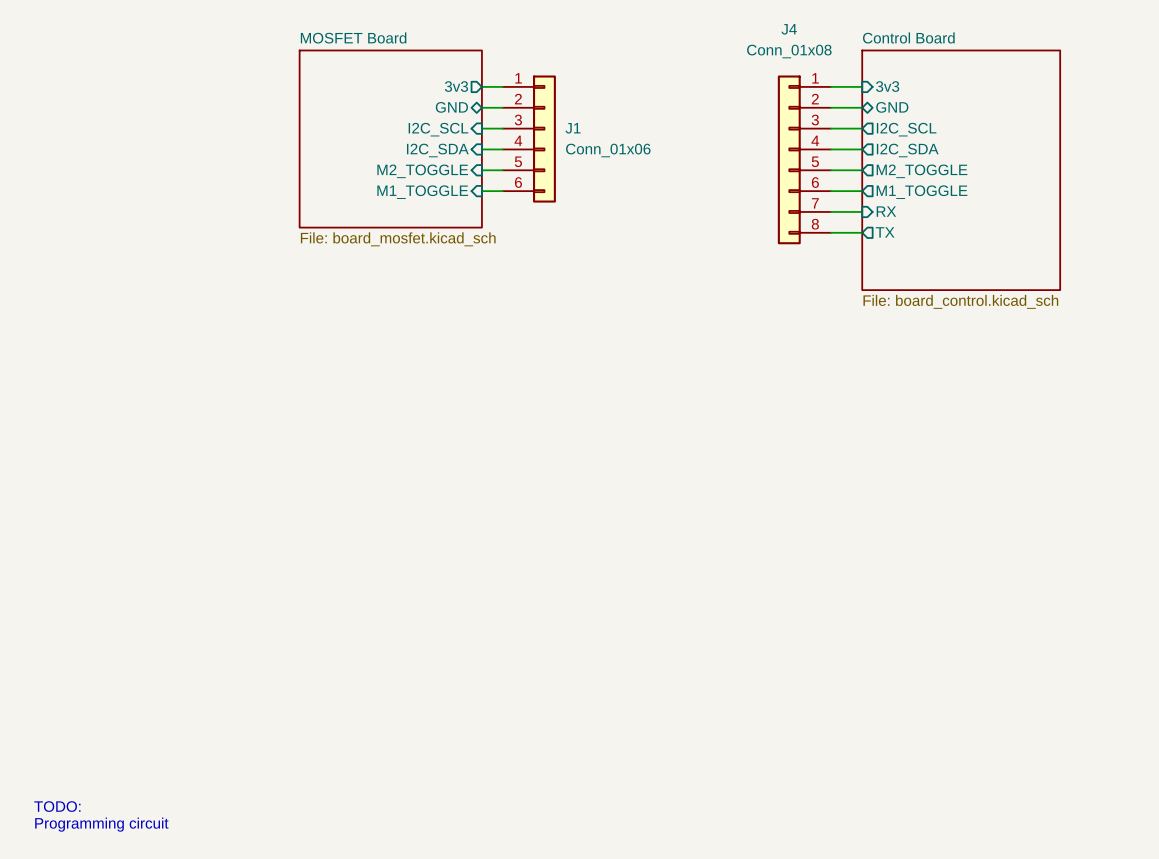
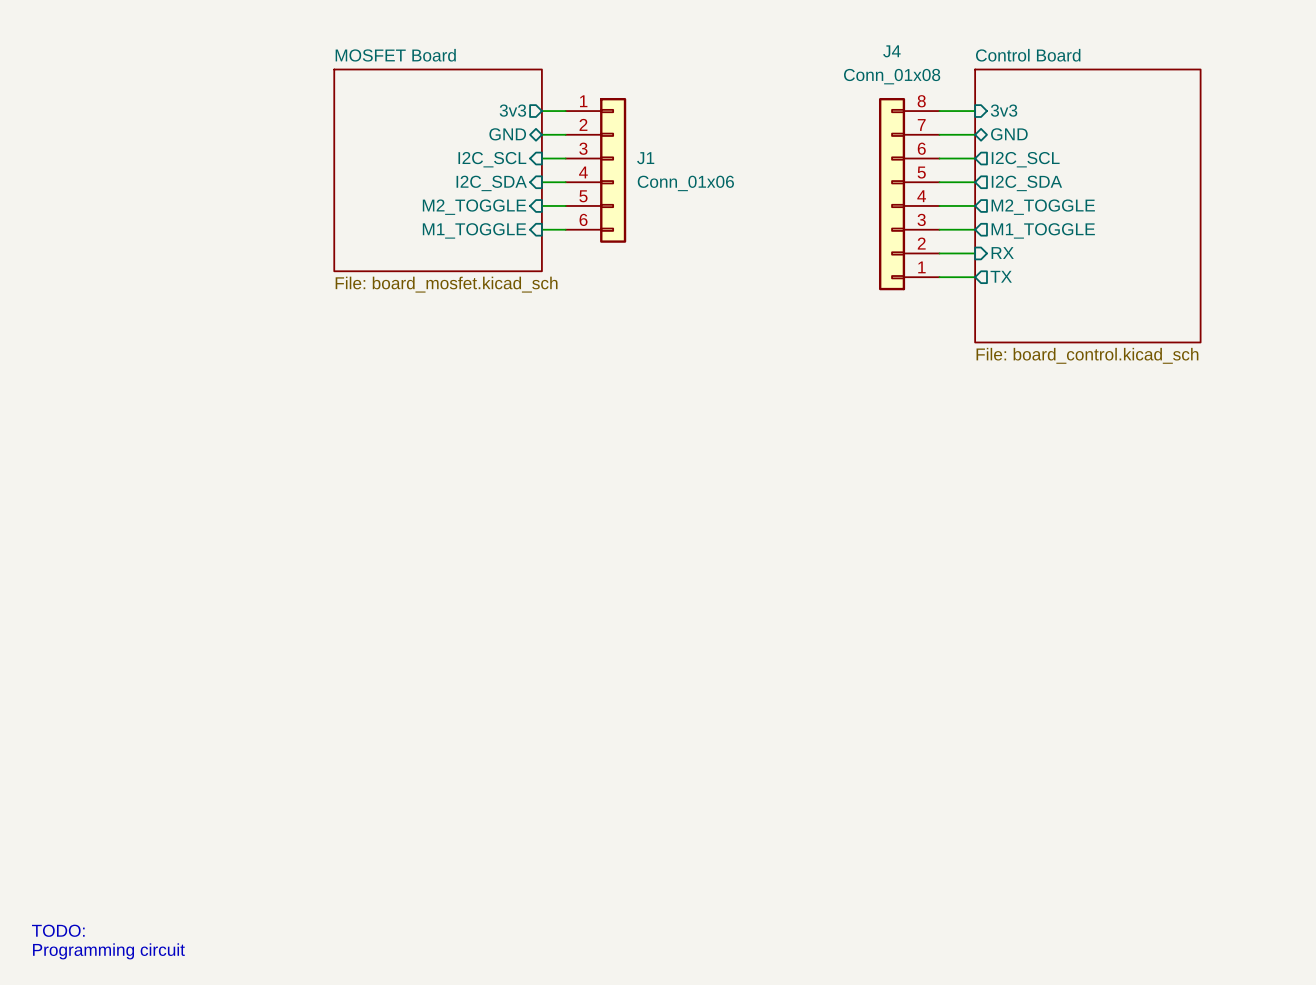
J4 flip: as is (789, 159) -> up-down (892, 194)

